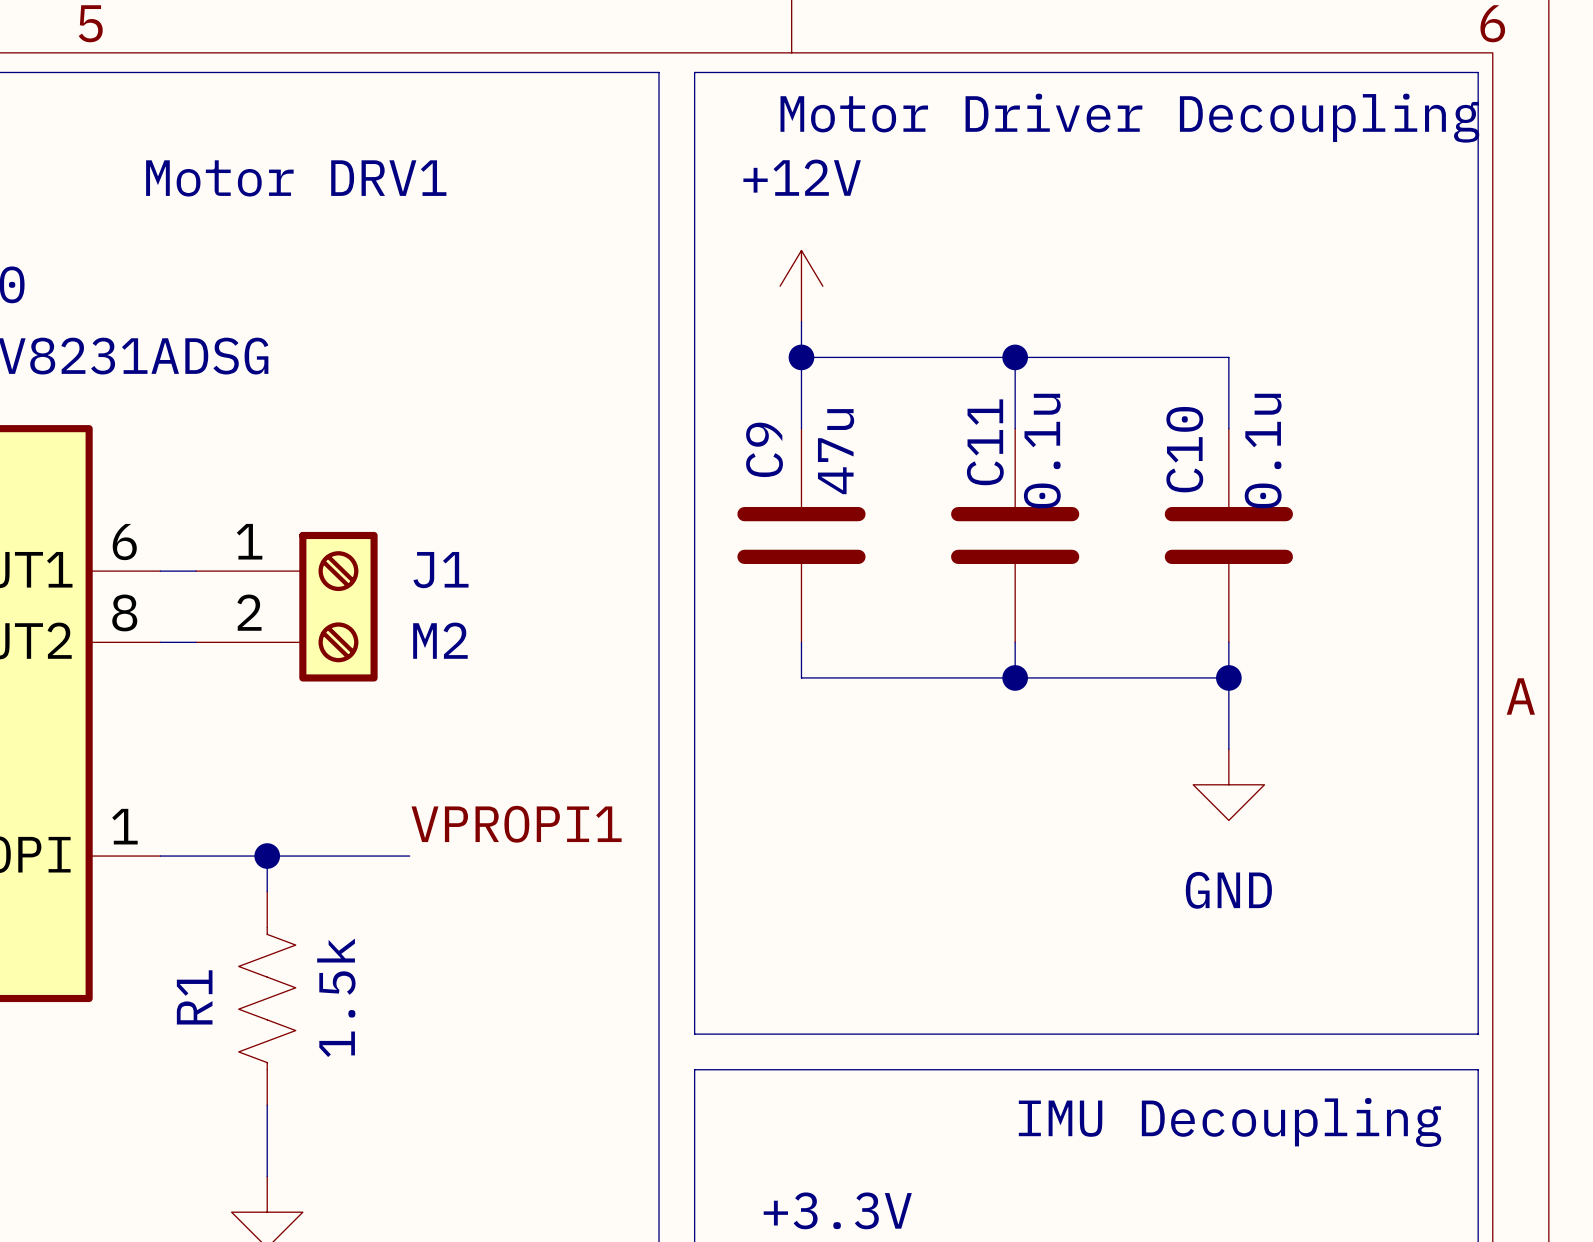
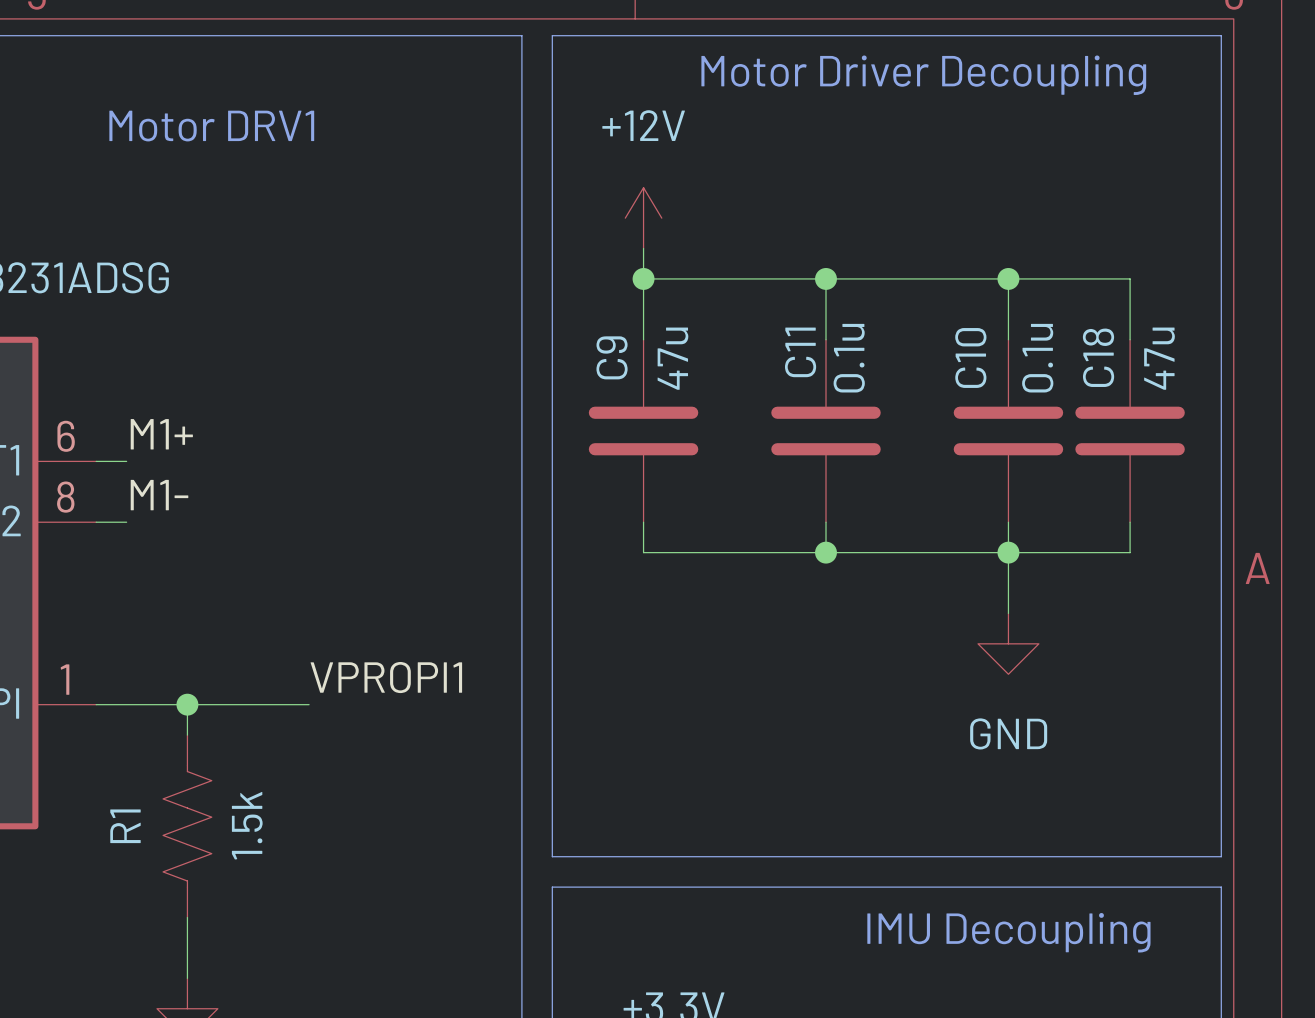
wire: none -> (1008, 278) (1130, 278) (1130, 339)
junction: none -> (1008, 278)
C18: none -> 47u (1130, 430)
label: none -> M1+ (161, 434)
J1: M2 (286, 606) -> none
label: none -> M1- (159, 495)
wire: none -> (1130, 522) (1130, 552) (1008, 552)

